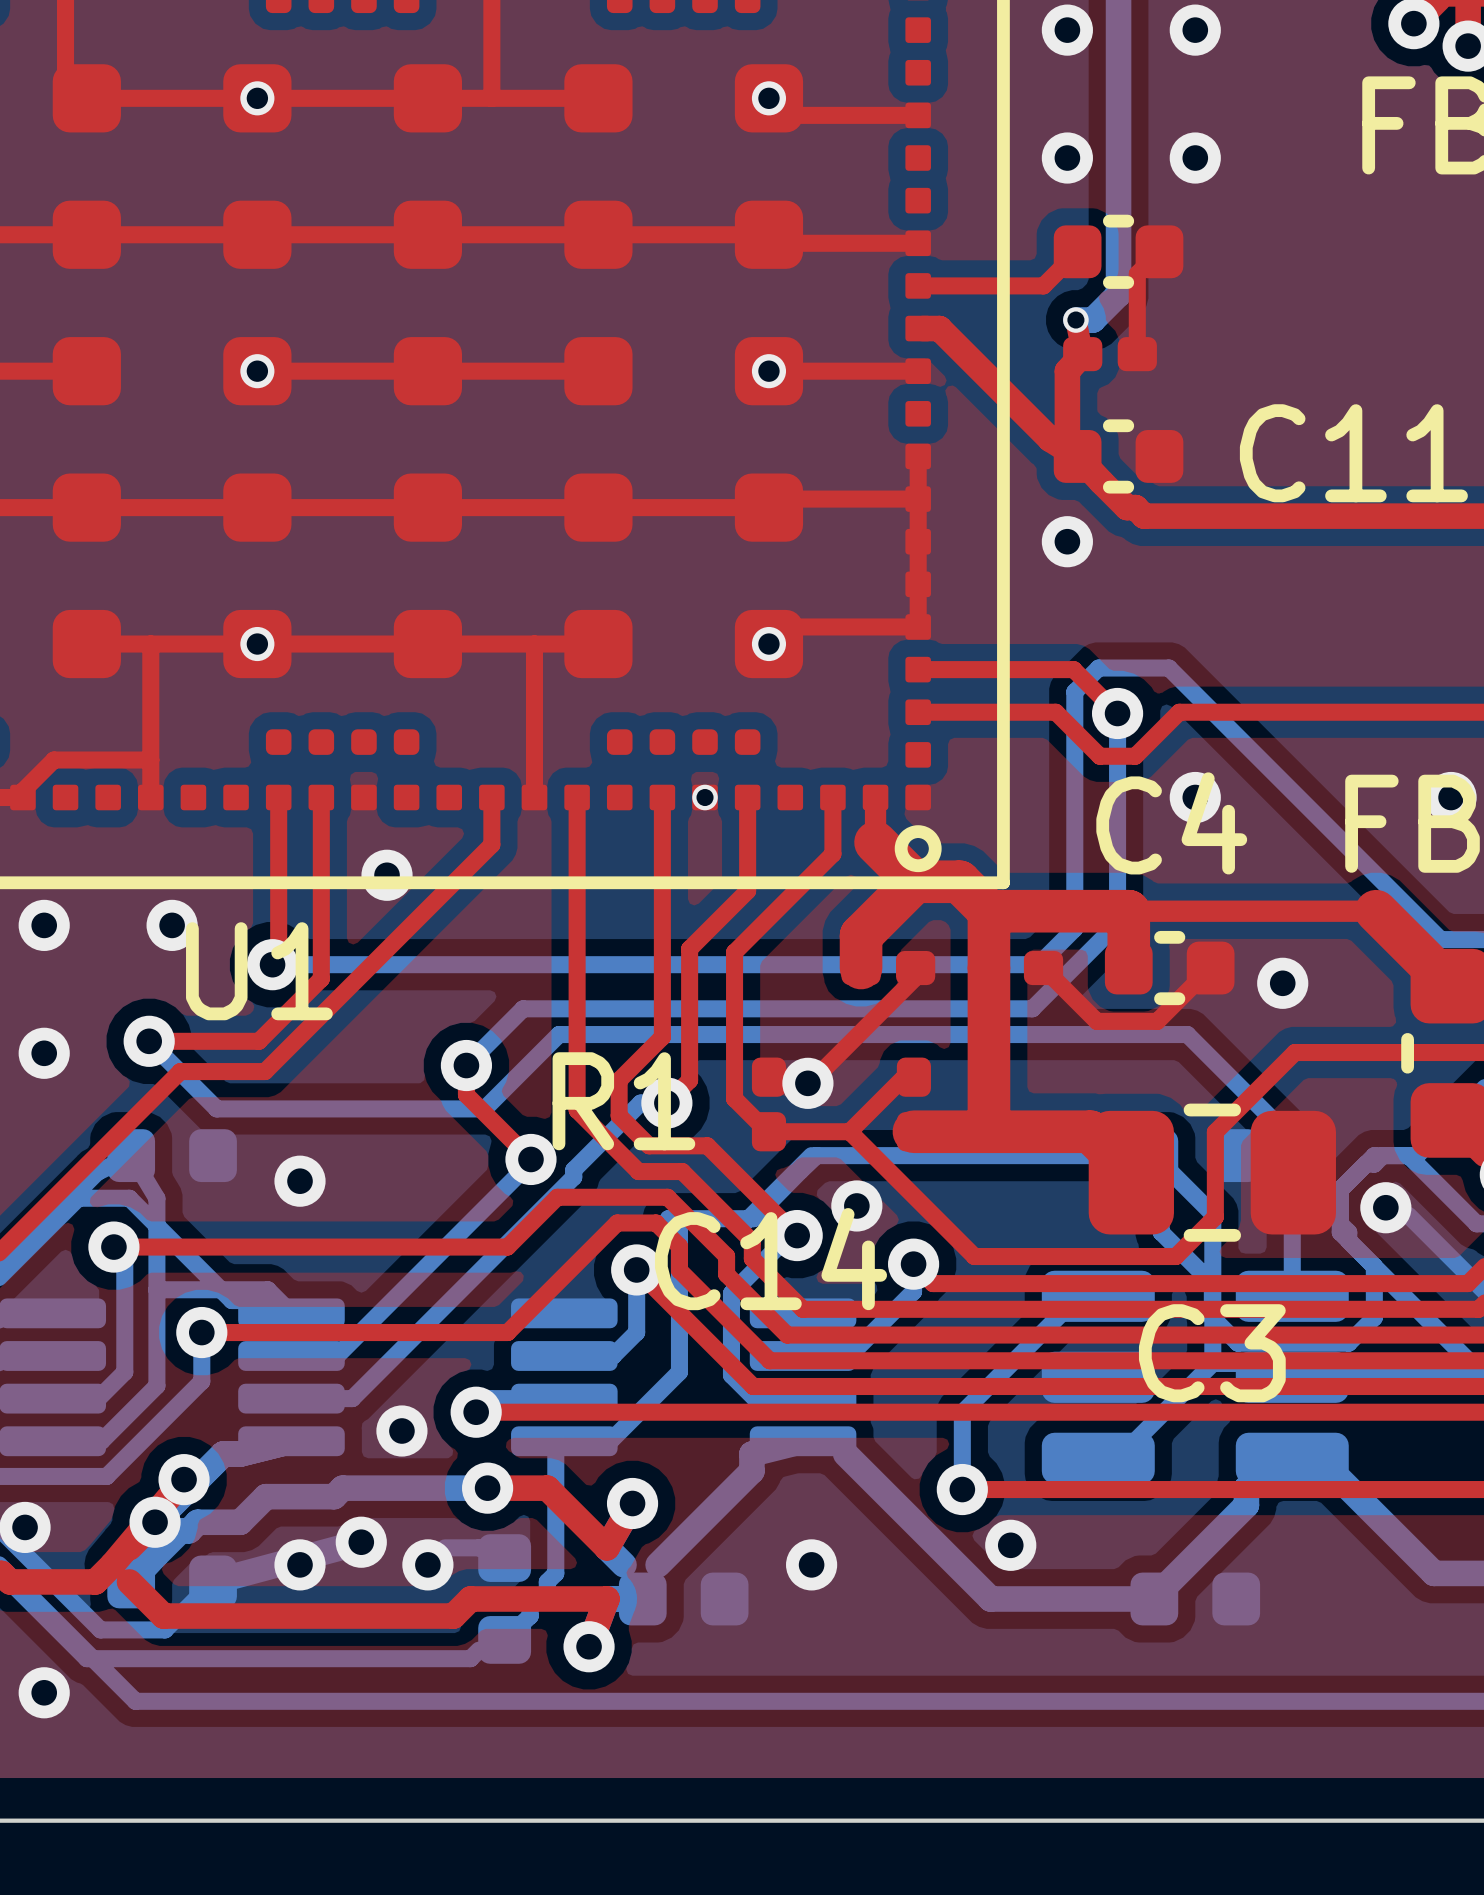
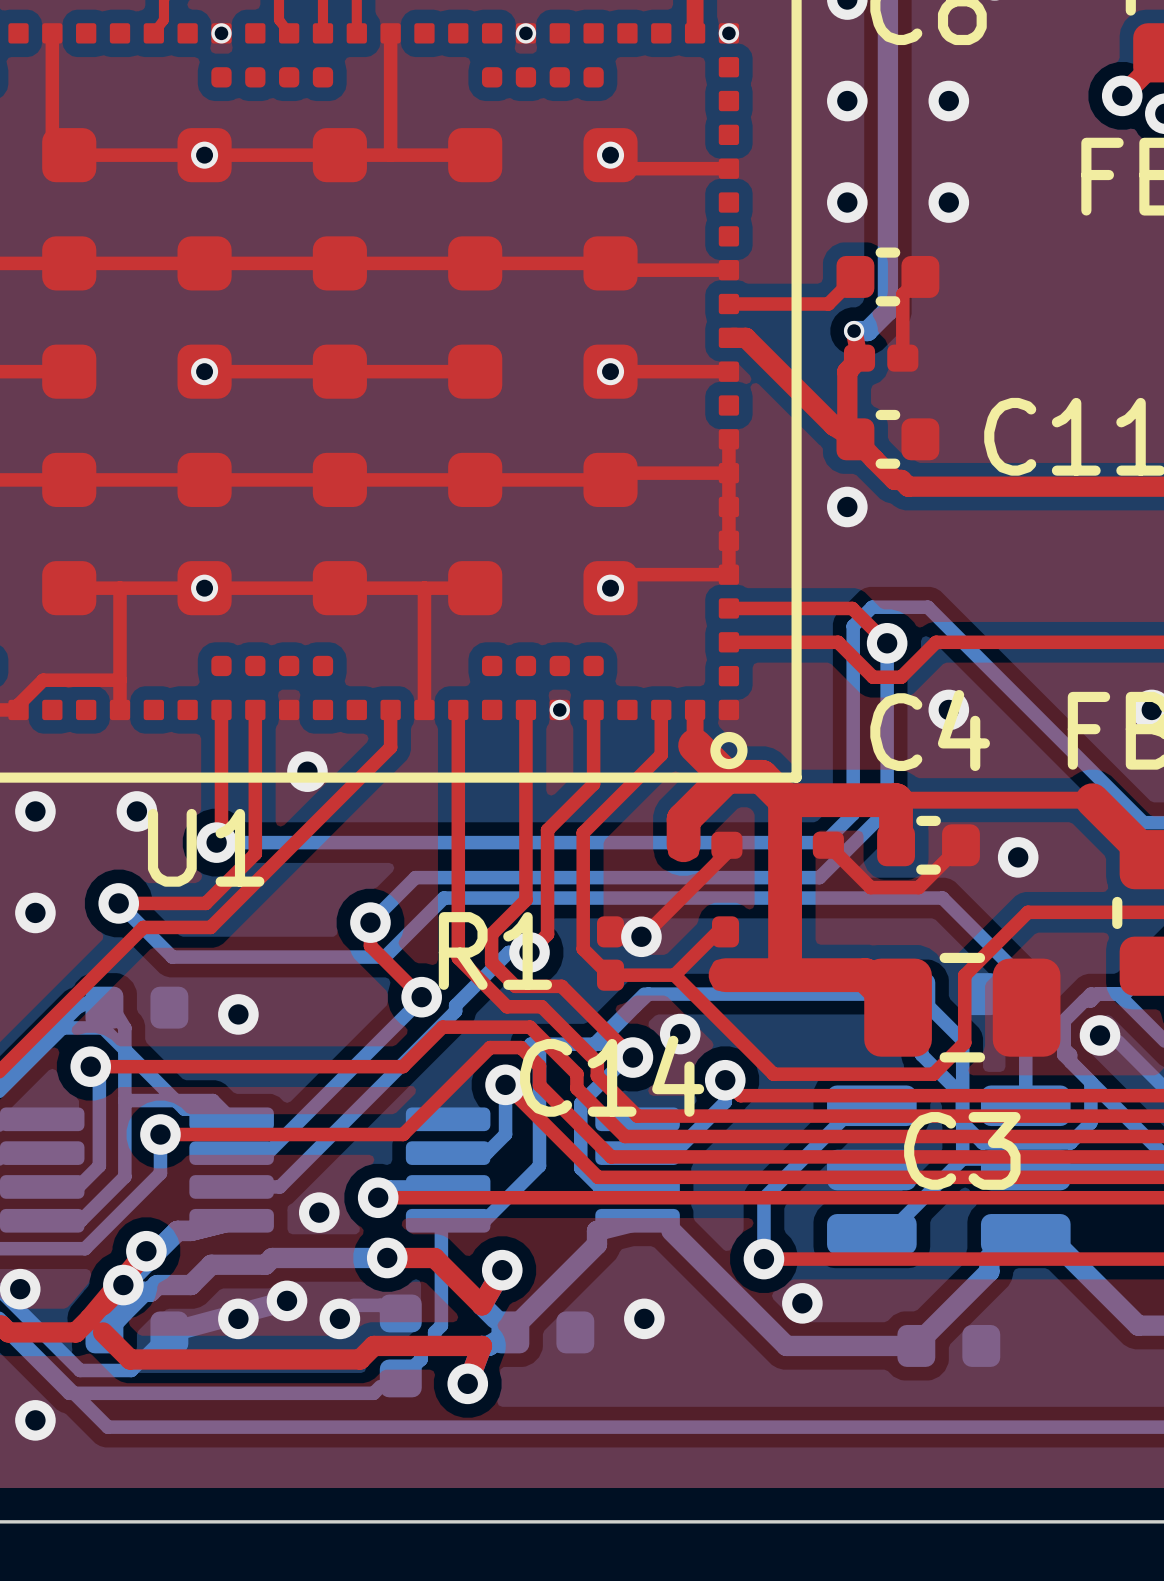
part position: (172, 1155) -> (136, 1007)
part position: (683, 1598) -> (542, 1332)

